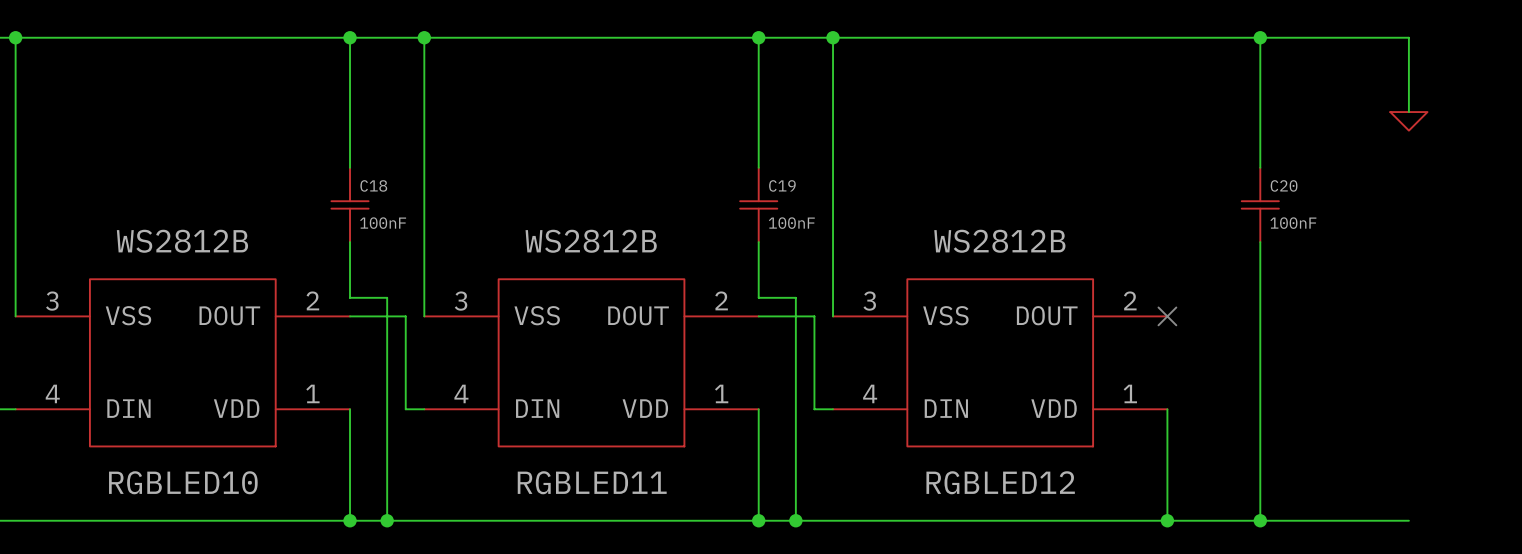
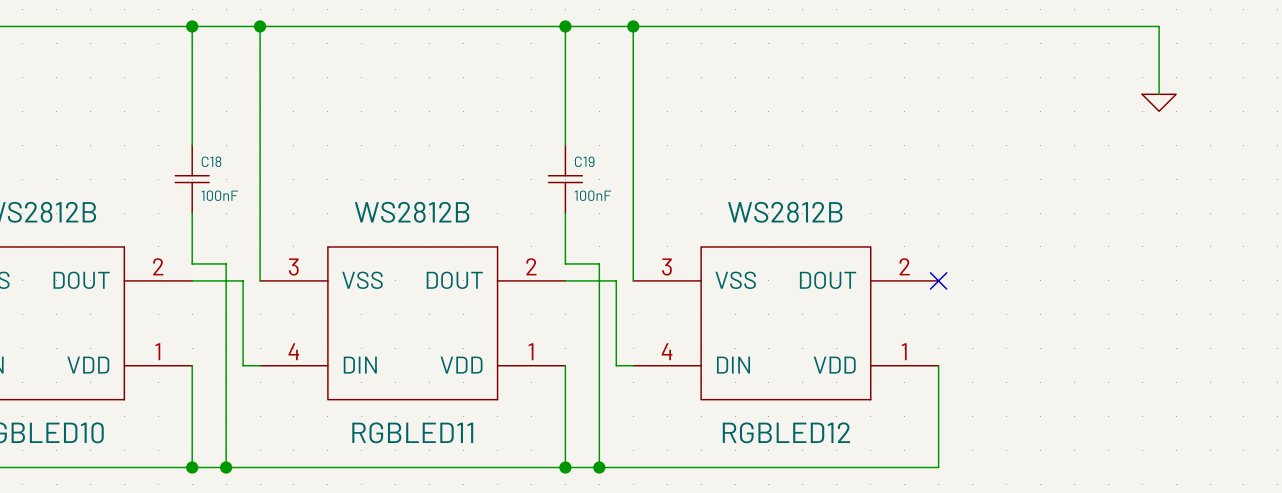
wire: (1260, 37) (1260, 167) -> none
junction: (1260, 37) -> none
C20: 100nF (1260, 204) -> none
wire: (1260, 242) (1260, 520) -> none
wire: (1167, 520) (1408, 520) -> none
junction: (1167, 520) -> none
junction: (1260, 520) -> none

